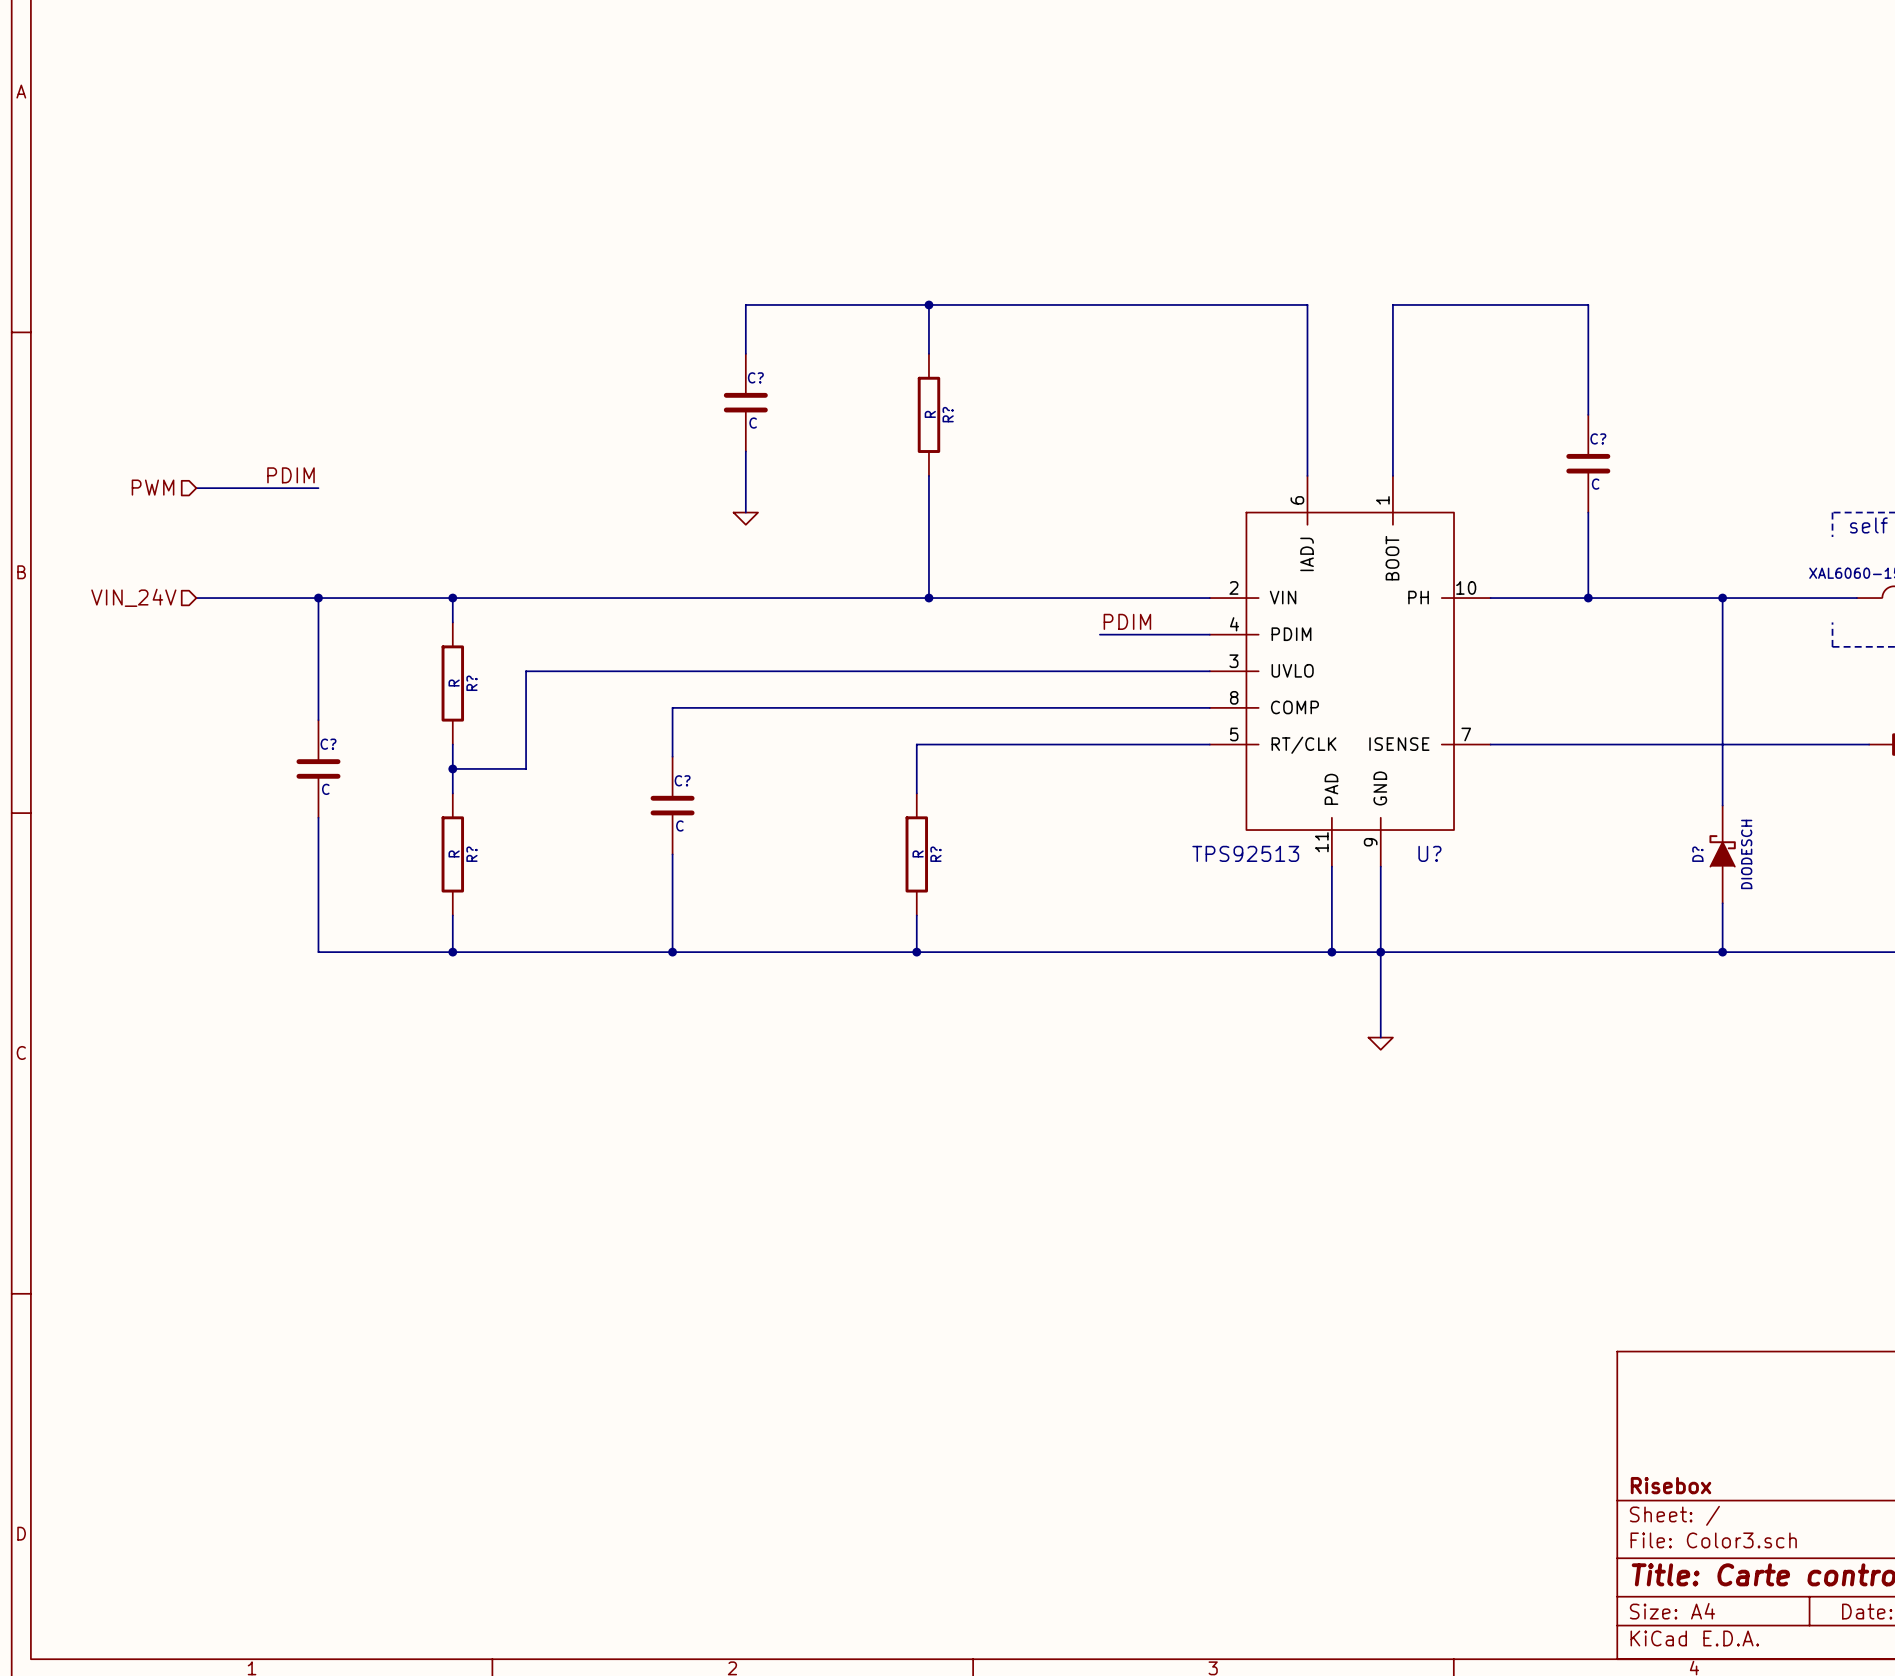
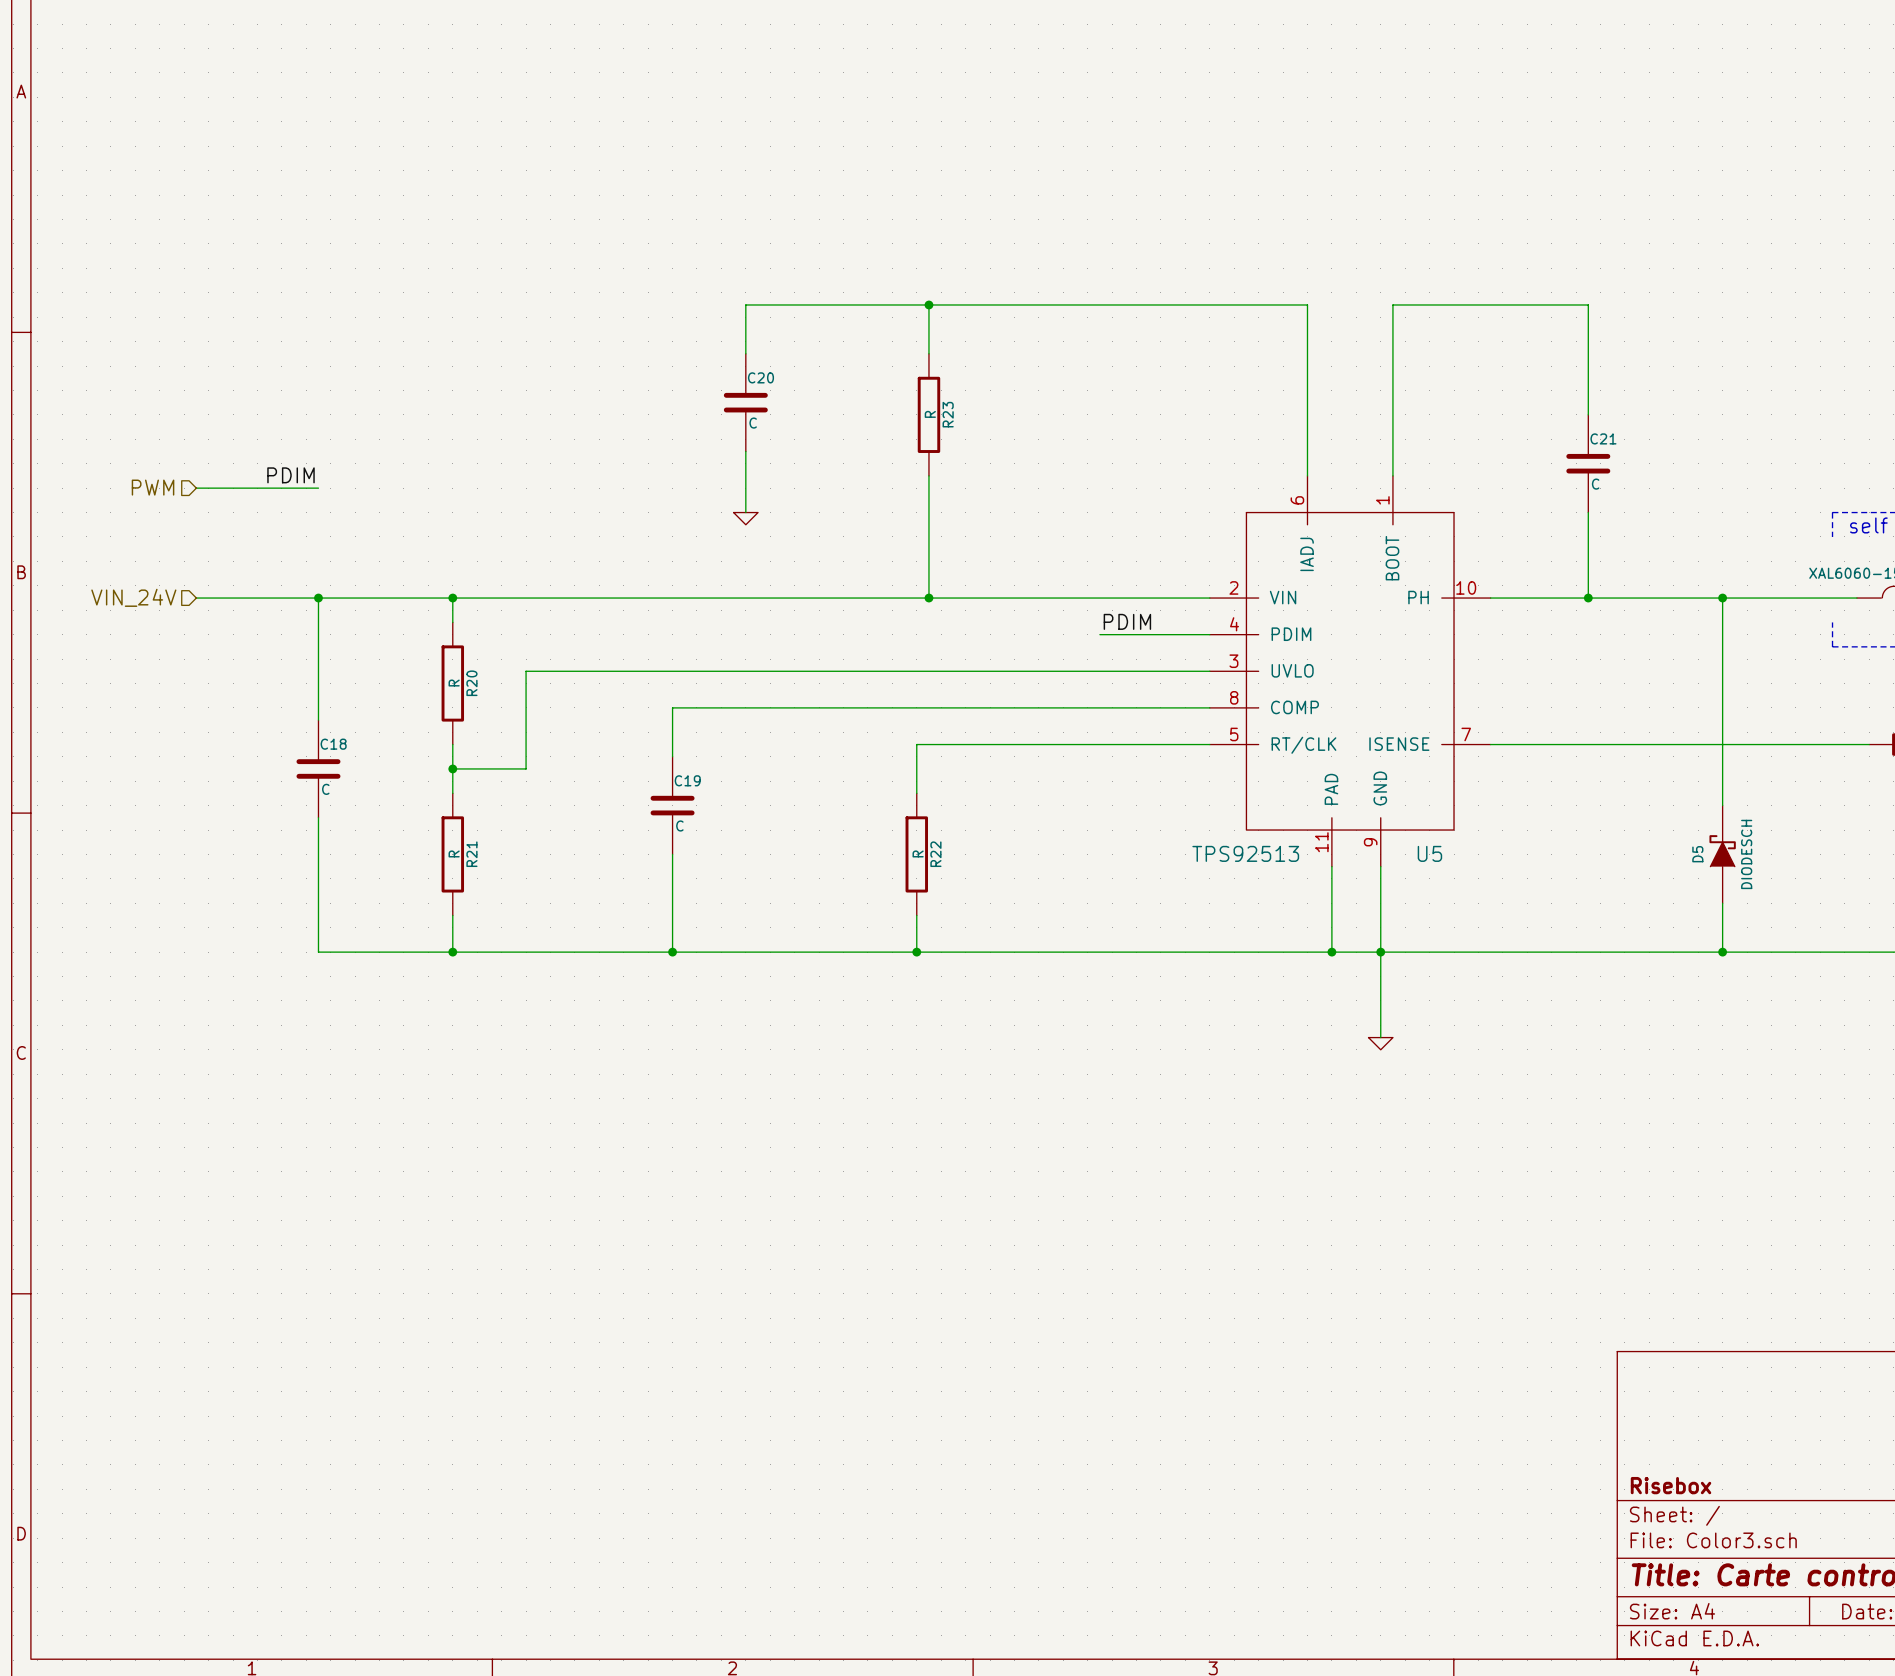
C? name: C? (755, 377) -> C20 (760, 377)
R? name: R? (948, 414) -> R23 (948, 414)
C? name: C? (1598, 438) -> C21 (1603, 438)
R? name: R? (471, 683) -> R20 (471, 683)
C? name: C? (328, 744) -> C18 (333, 744)
C? name: C? (682, 780) -> C19 (687, 780)
U? name: U? (1429, 853) -> U5 (1429, 853)
R? name: R? (471, 854) -> R21 (471, 854)
R? name: R? (935, 854) -> R22 (935, 854)
D? name: D? (1697, 854) -> D5 (1697, 854)

